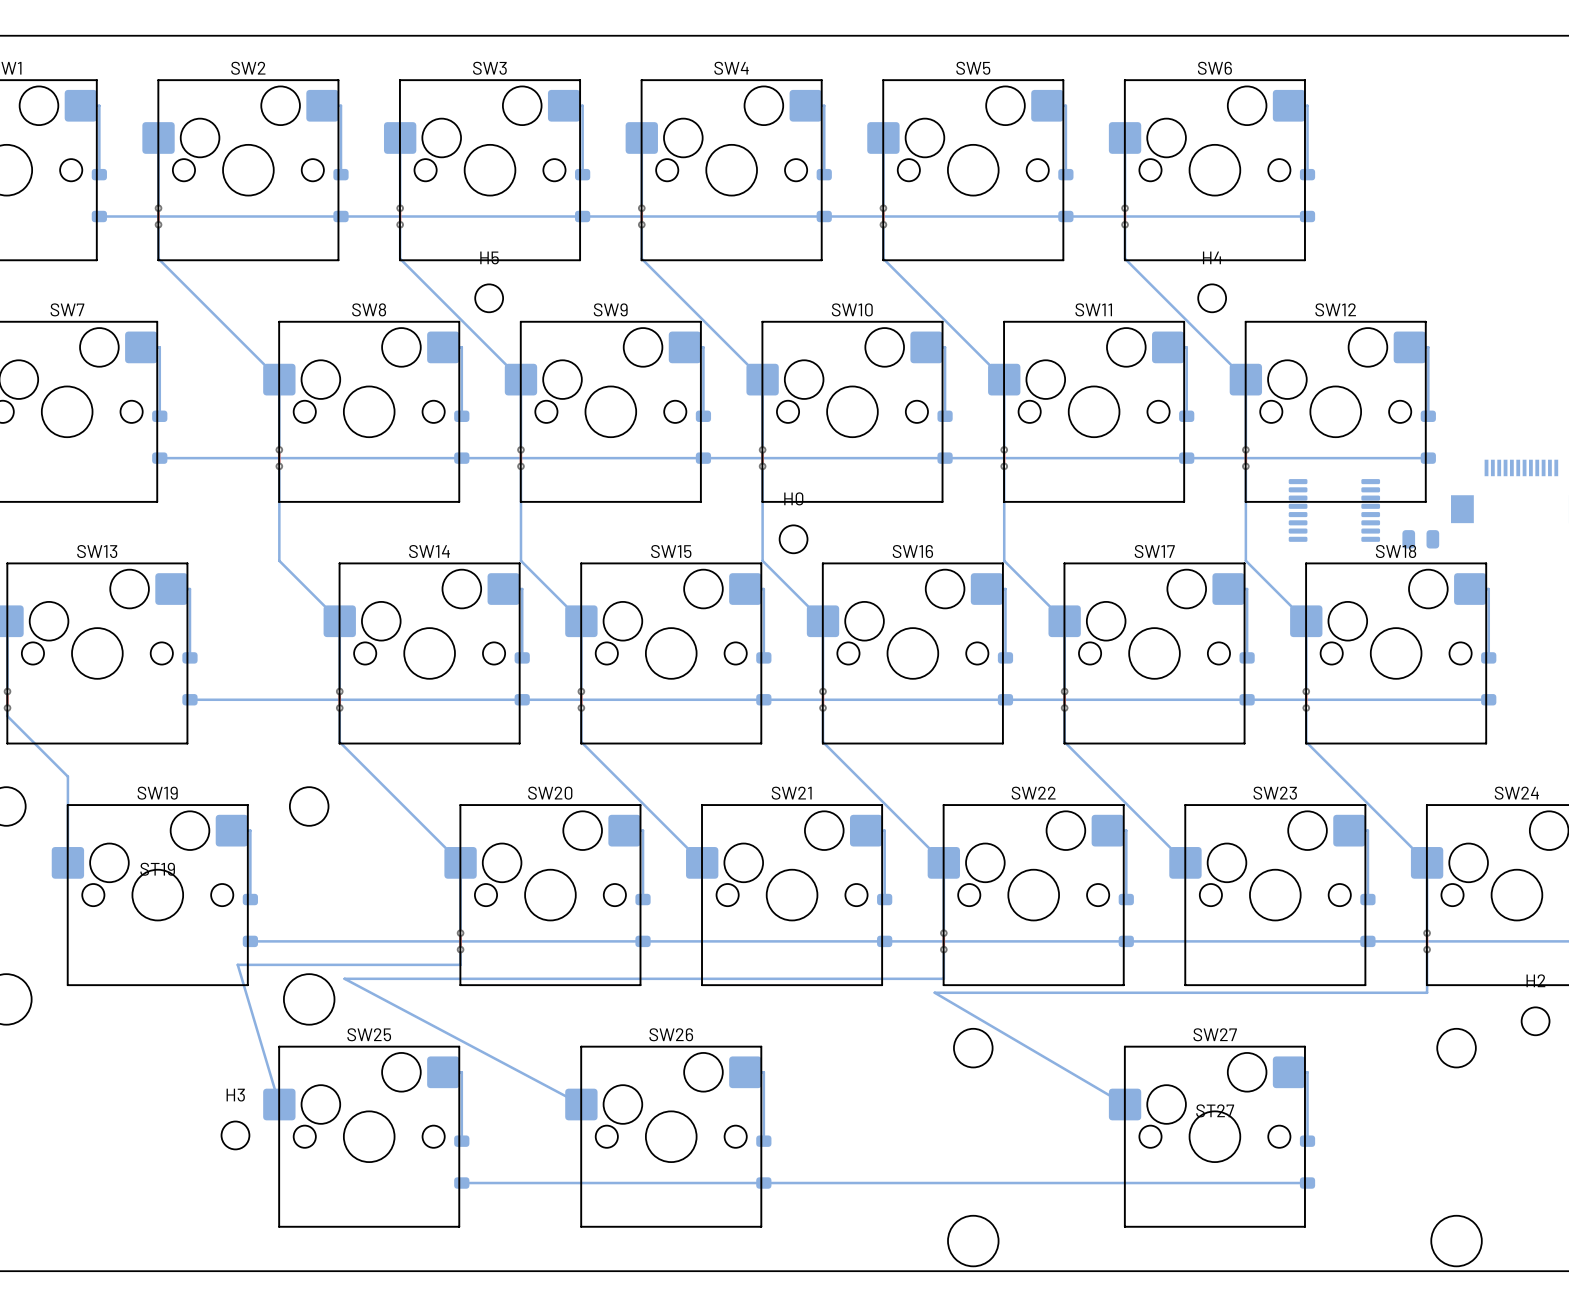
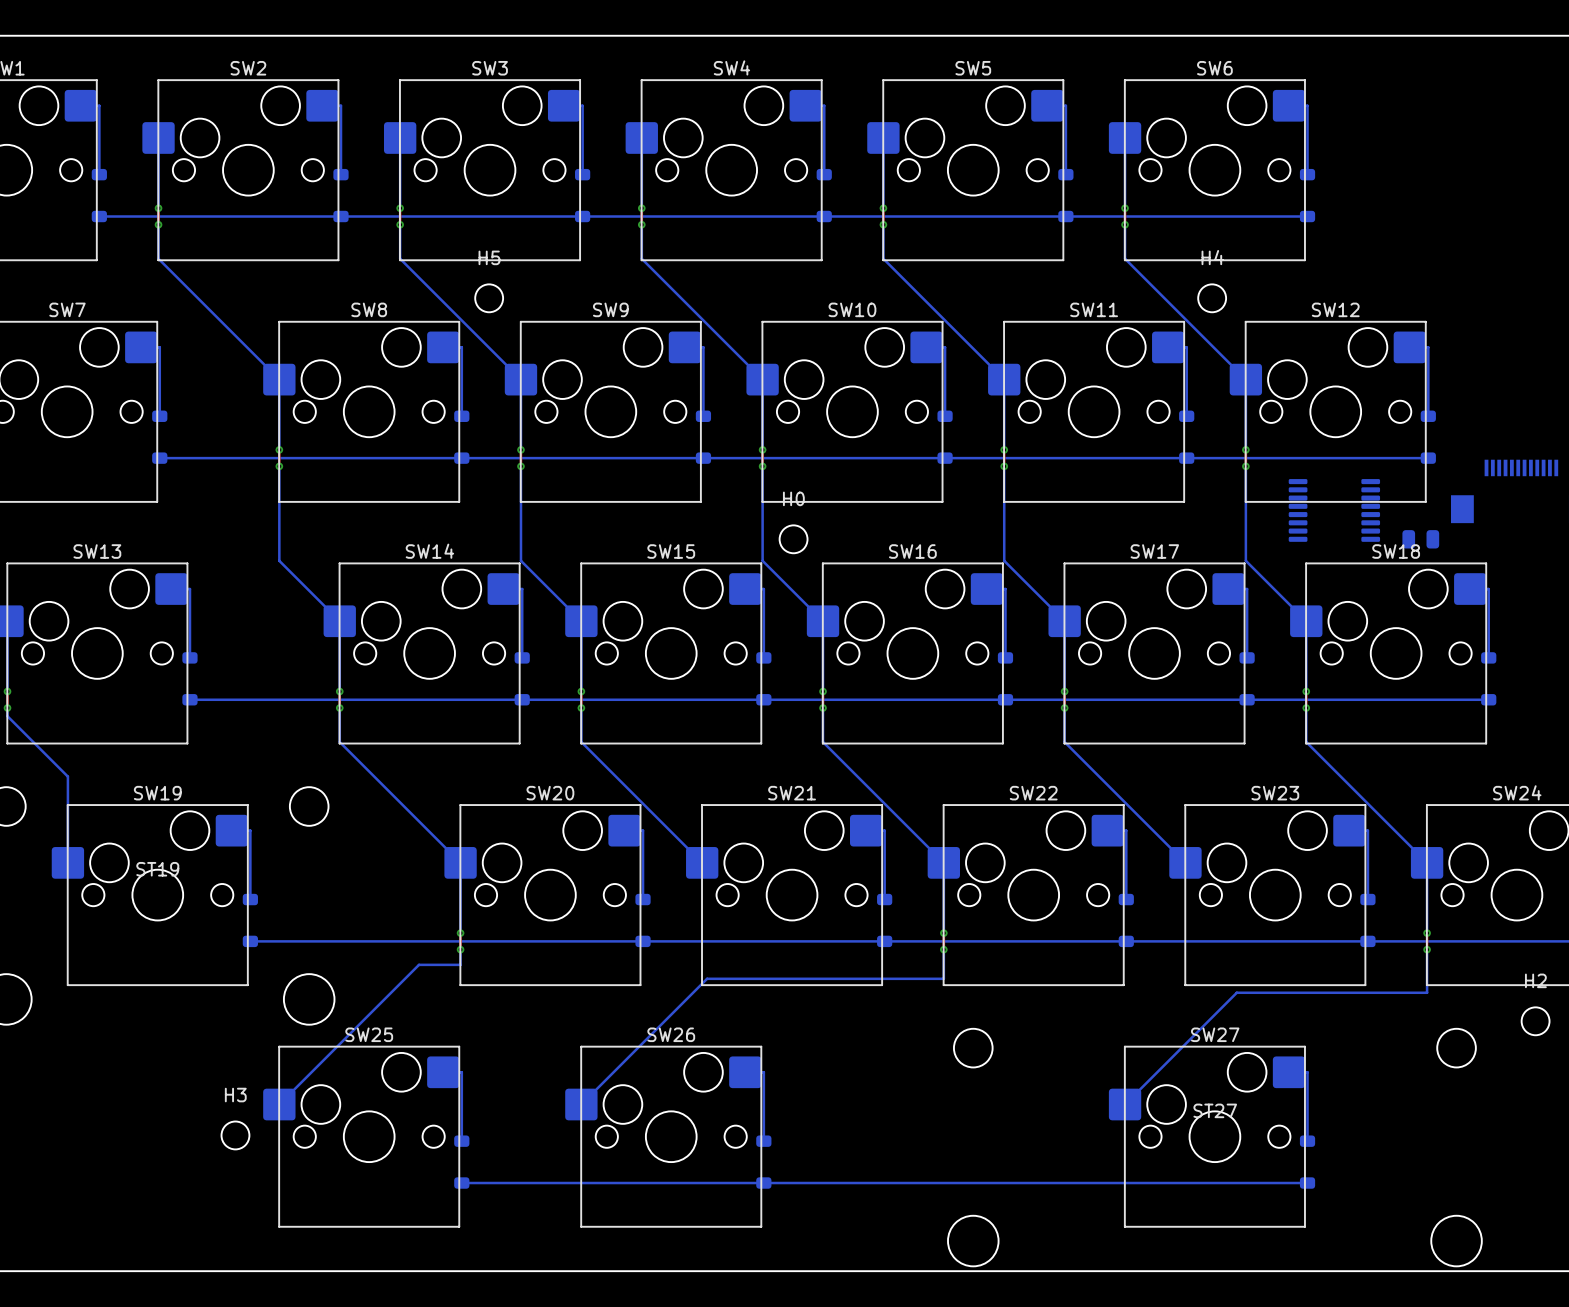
bottom track: (418, 964) (237, 964) (279, 1104) -> (418, 964) (279, 1104)
bottom track: (707, 978) (344, 978) (581, 1104) -> (707, 978) (581, 1104)
bottom track: (1236, 992) (934, 992) (1125, 1104) -> (1236, 992) (1125, 1104)

